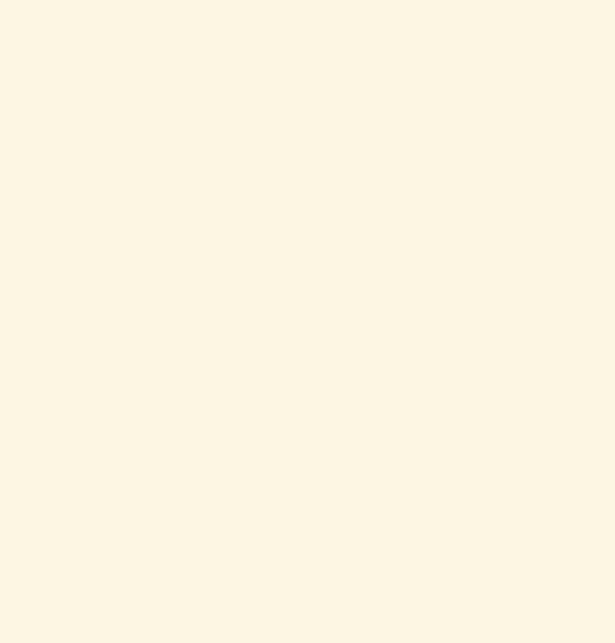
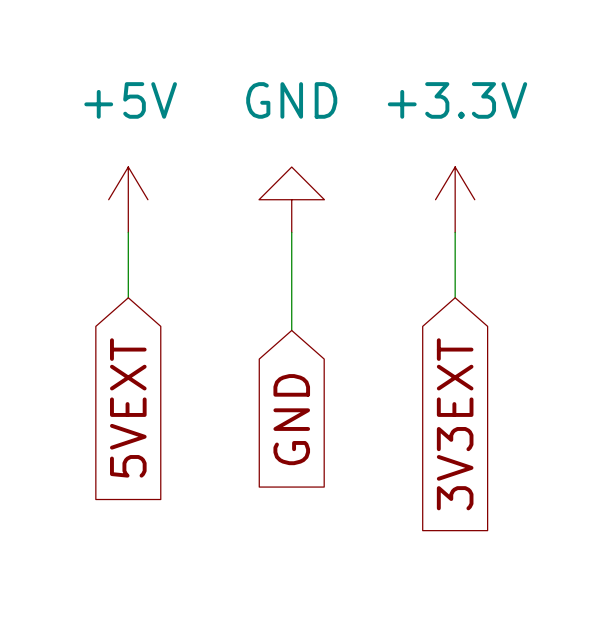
power symbol: none -> +5V (128, 199)
power symbol: none -> GND (291, 199)
power symbol: none -> +3.3V (455, 199)
wire: none -> (128, 232) (128, 297)
wire: none -> (291, 232) (291, 330)
wire: none -> (455, 232) (455, 297)
global label: none -> 5VEXT (128, 407)
global label: none -> GND (291, 419)
global label: none -> 3V3EXT (455, 424)

